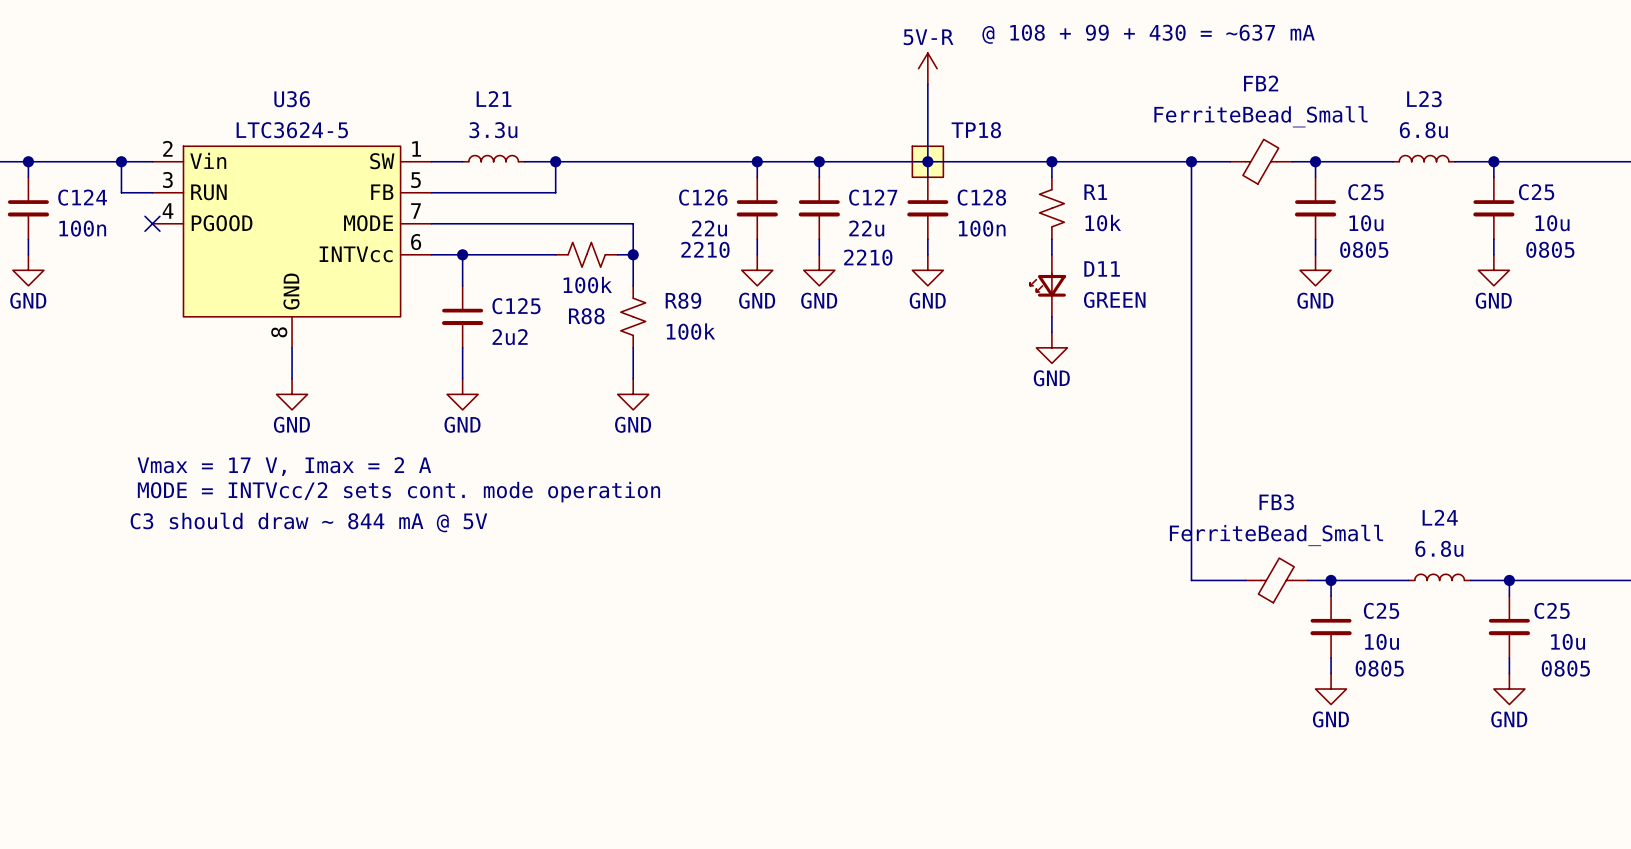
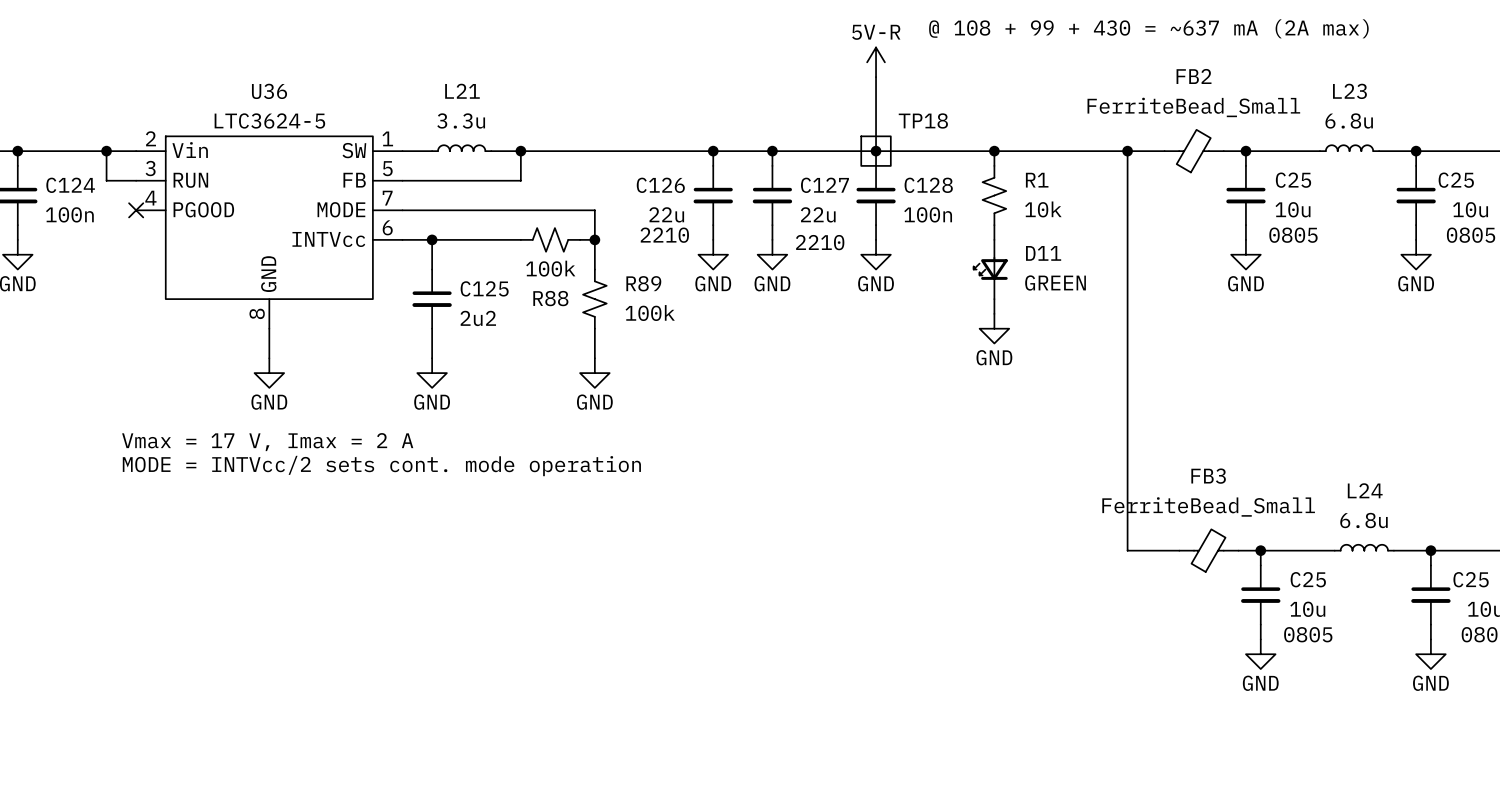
text: @ 108 + 99 + 430 = ~637 mA (1148, 34) -> @ 108 + 99 + 430 = ~637 mA (2A max) (1148, 28)
text: C3 should draw ~ 844 mA @ 5V (308, 522) -> none

